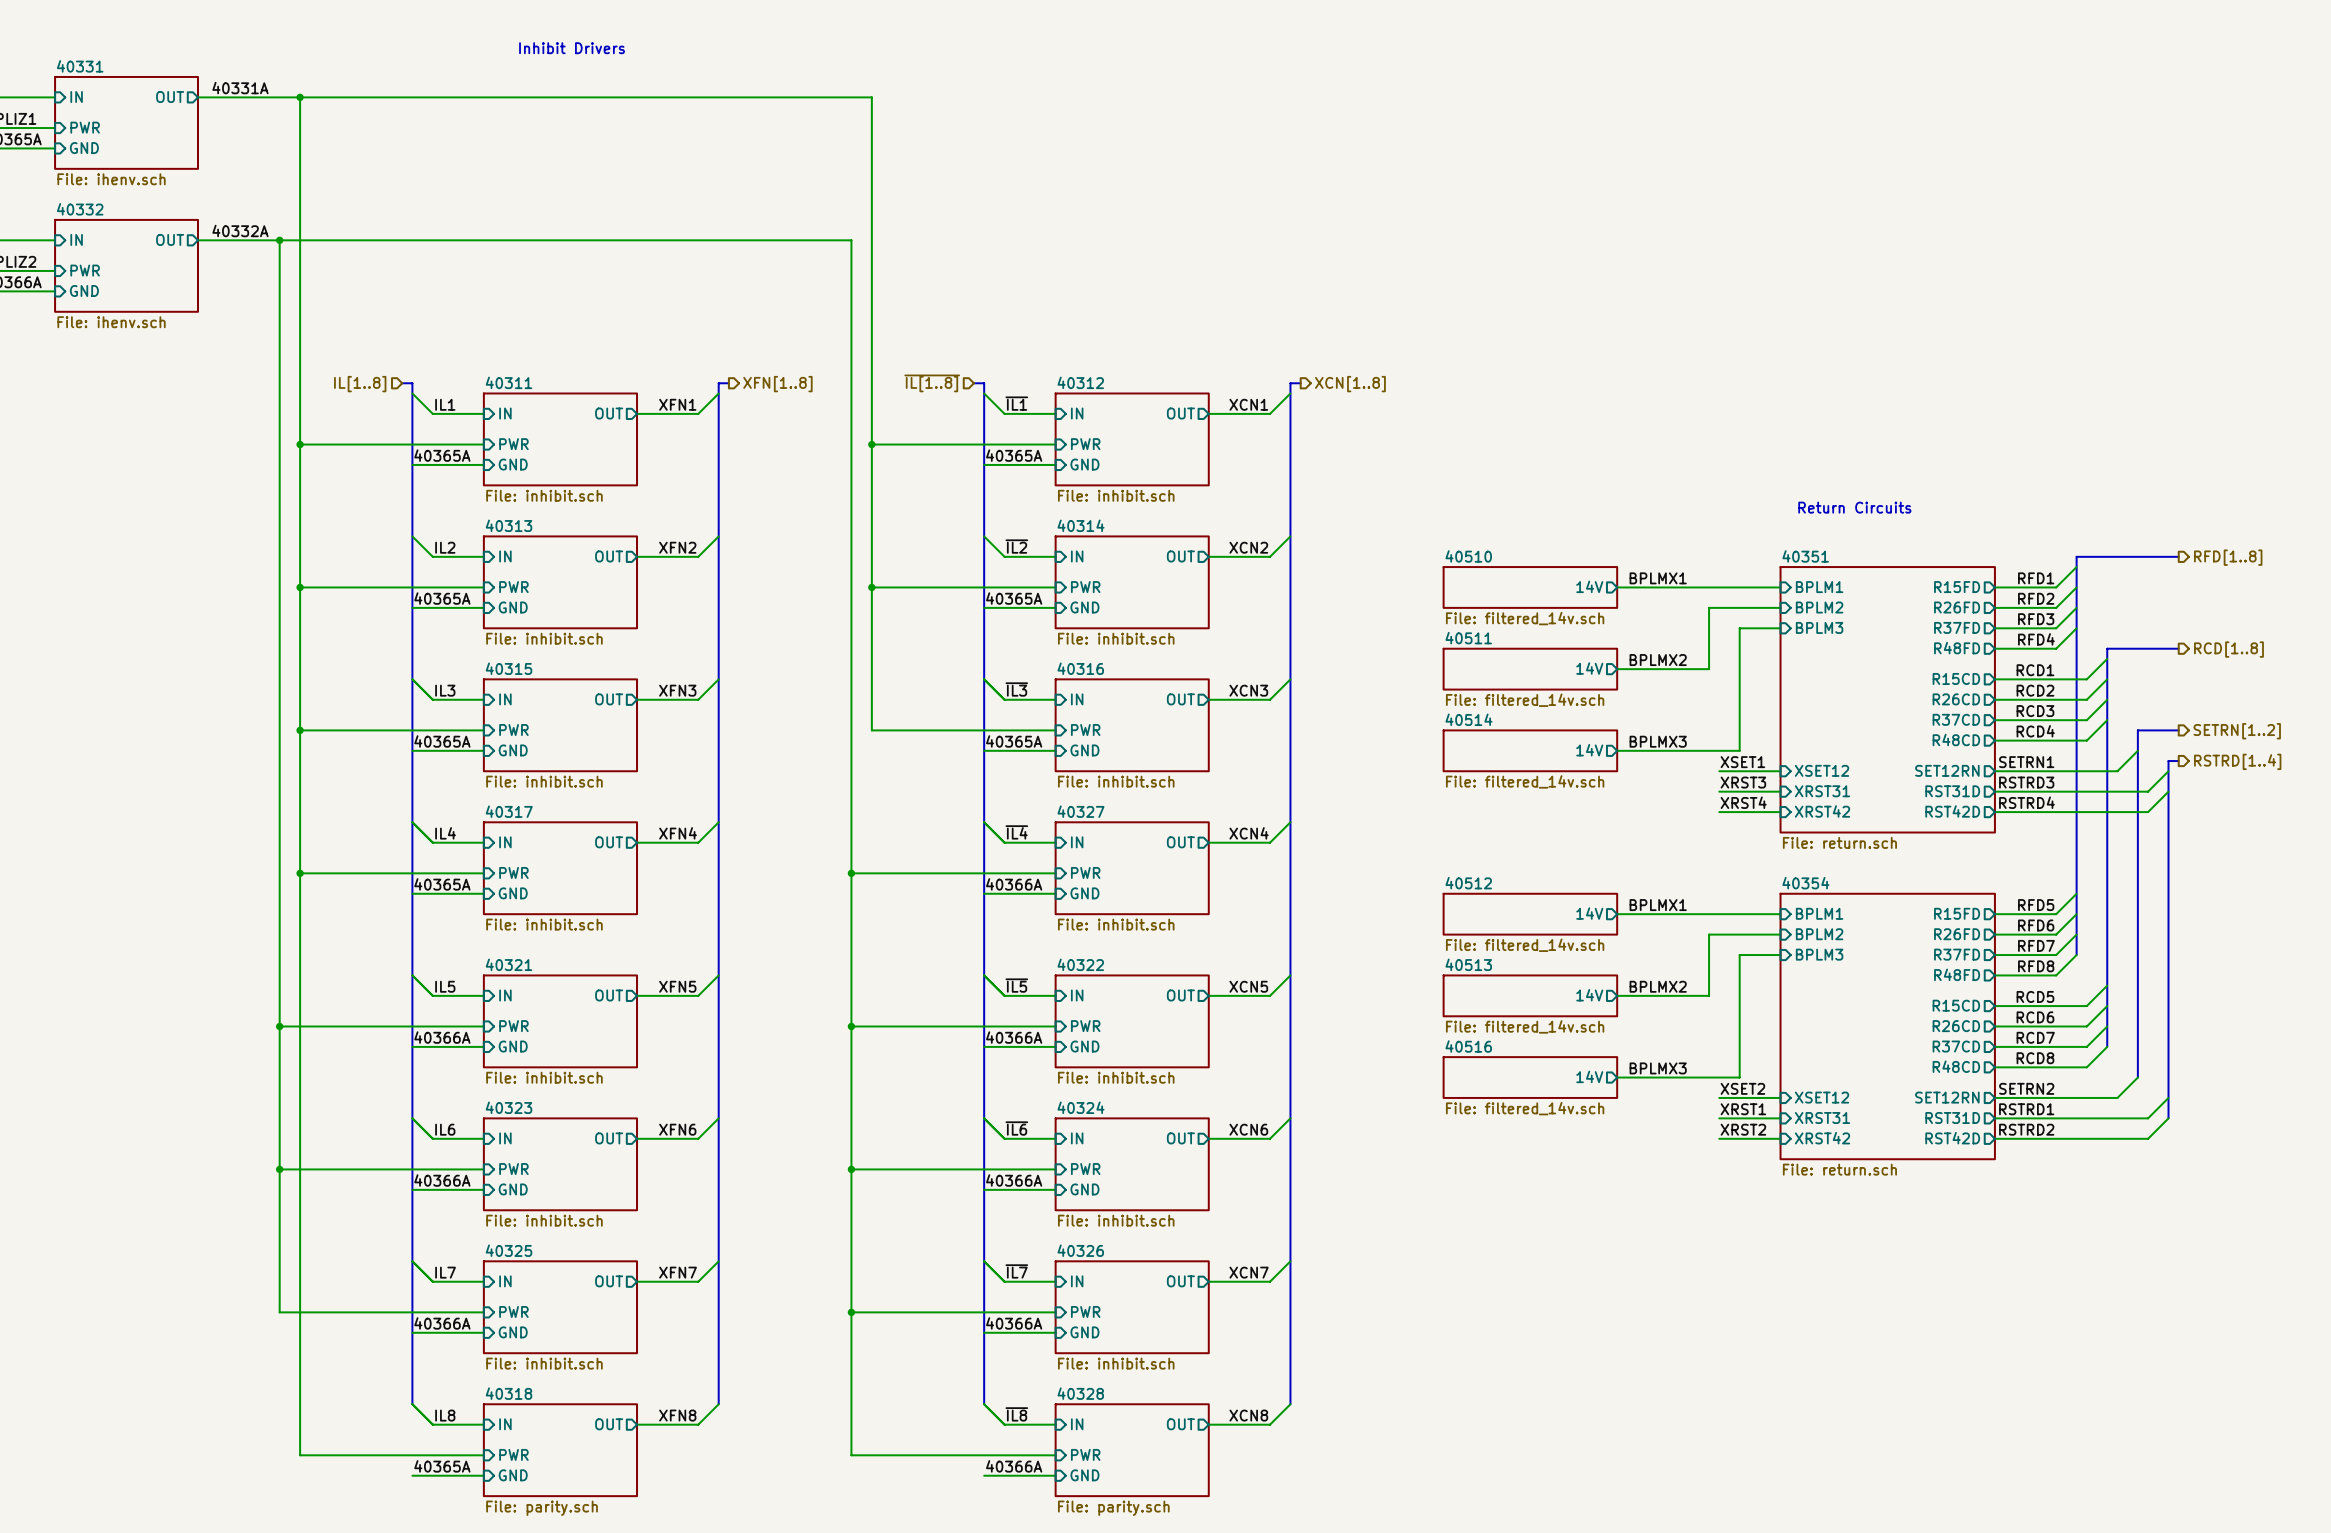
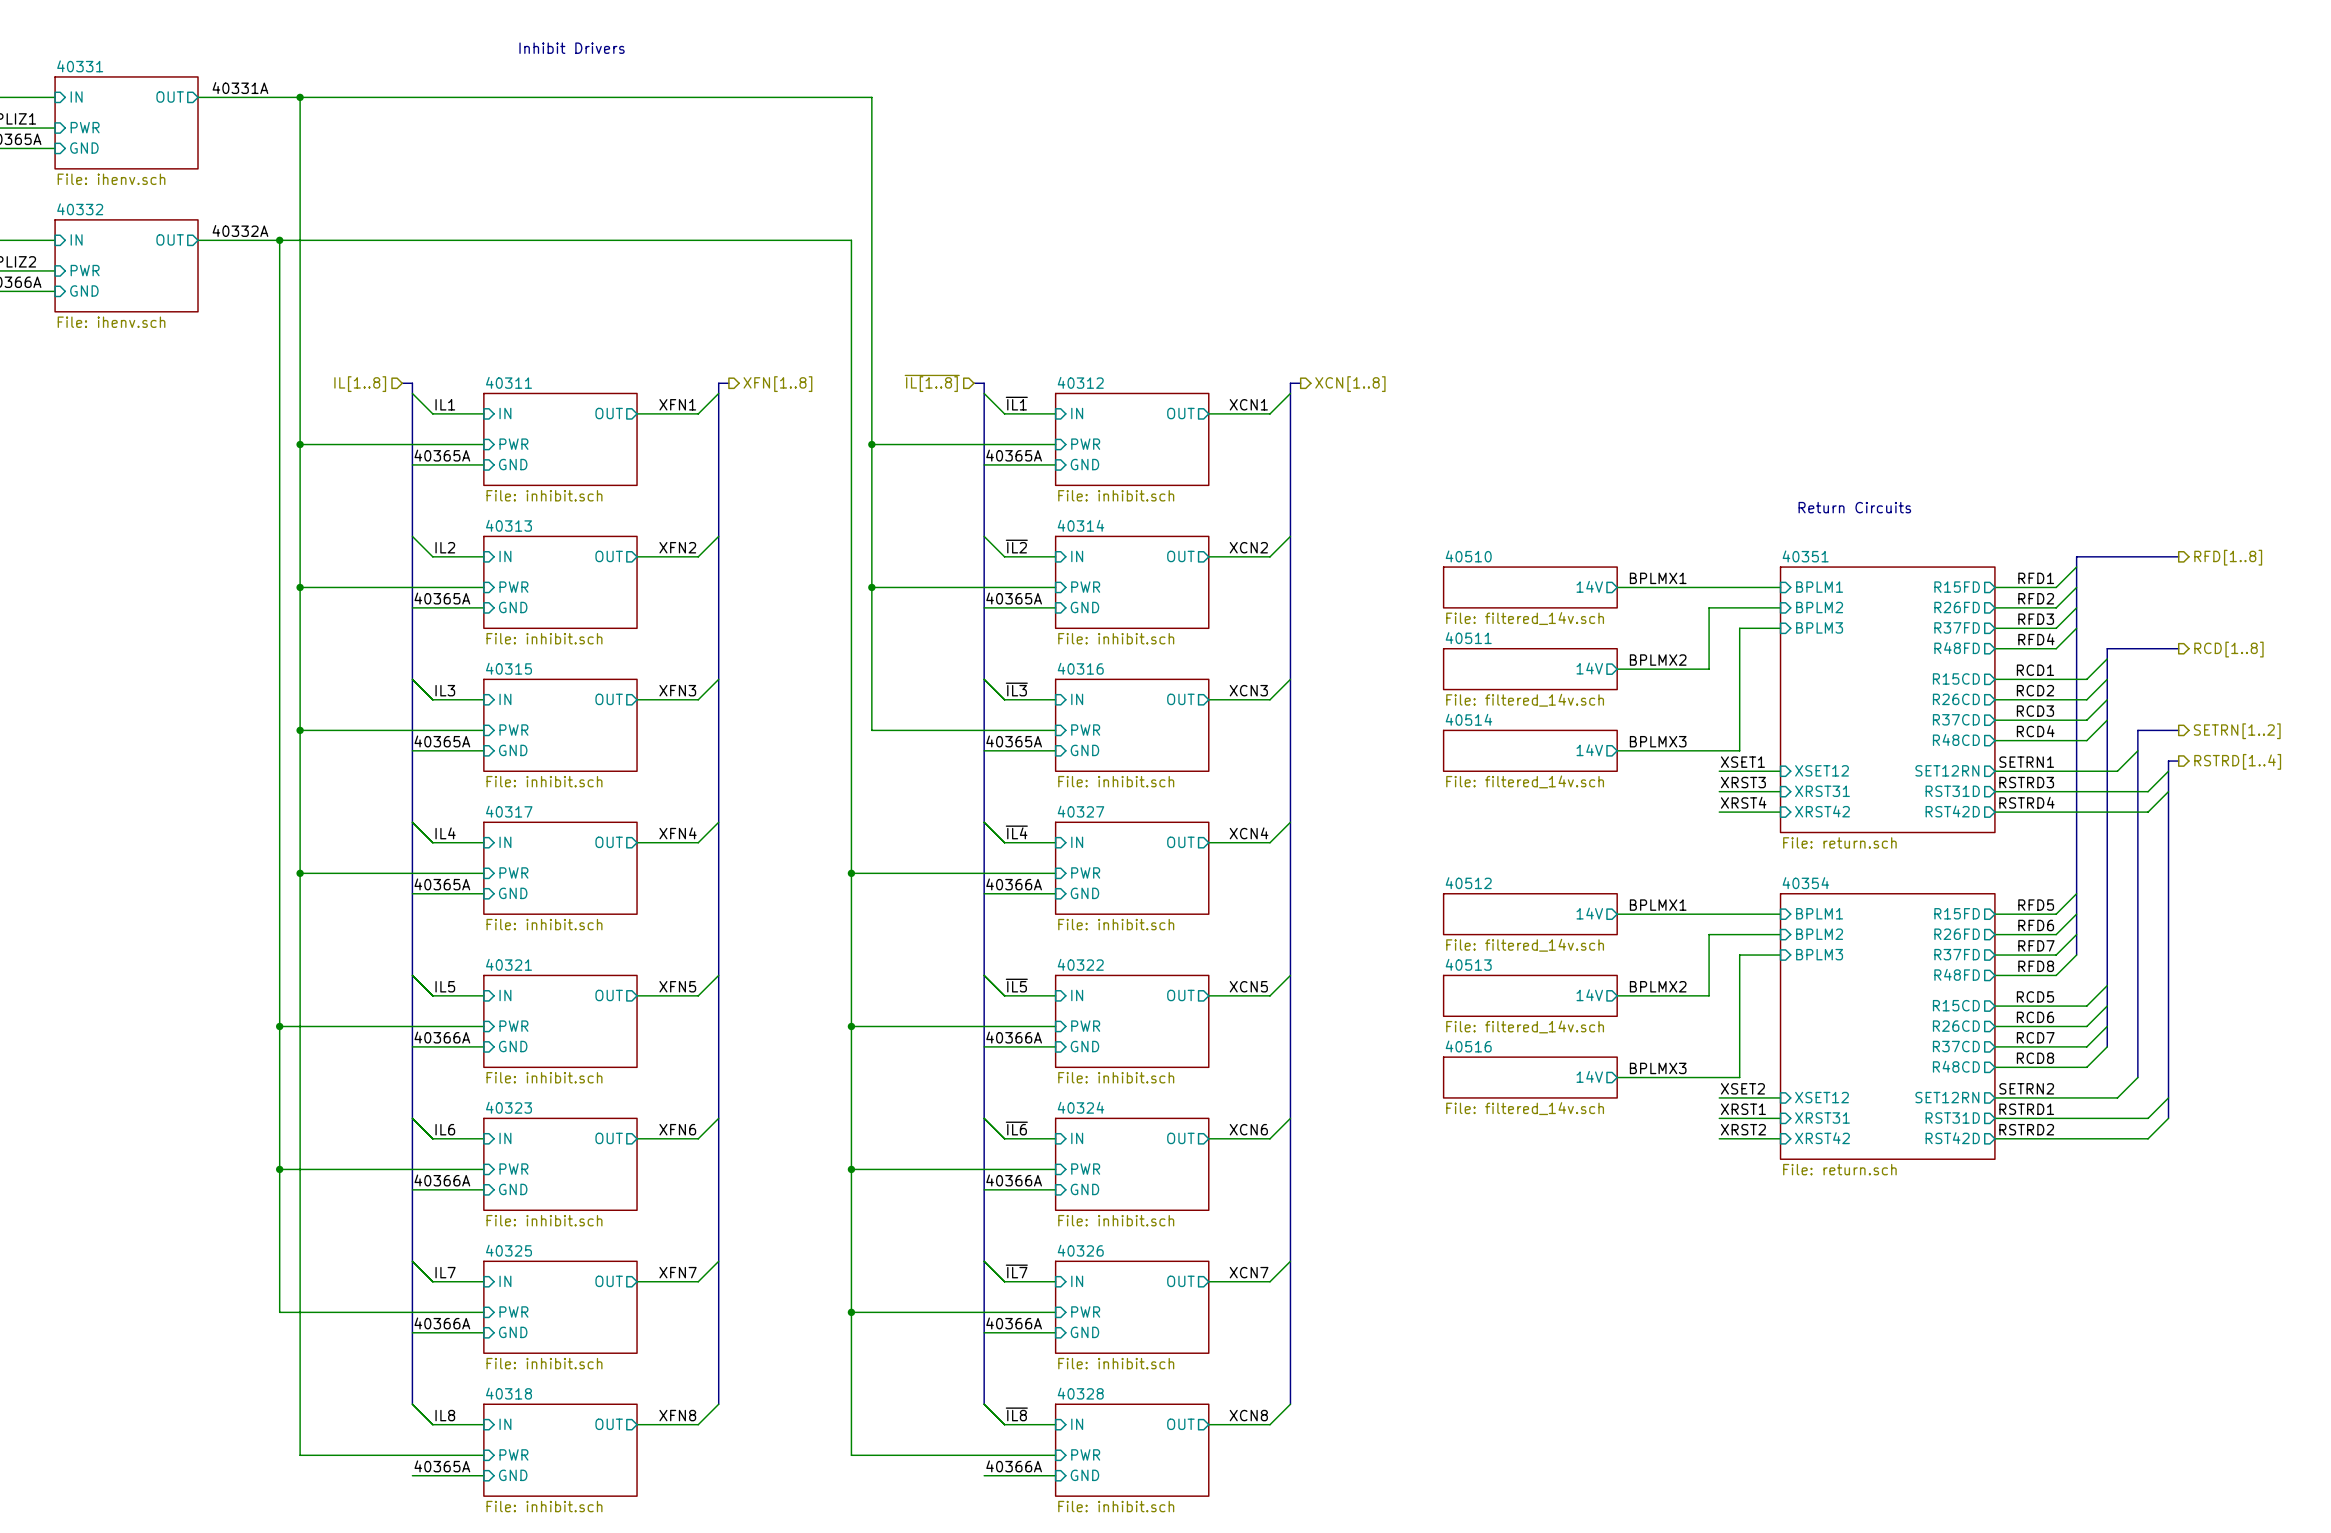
sheet 40318 value: File: parity.sch (542, 1508) -> File: inhibit.sch (544, 1506)
sheet 40328 value: File: parity.sch (1113, 1508) -> File: inhibit.sch (1116, 1506)

